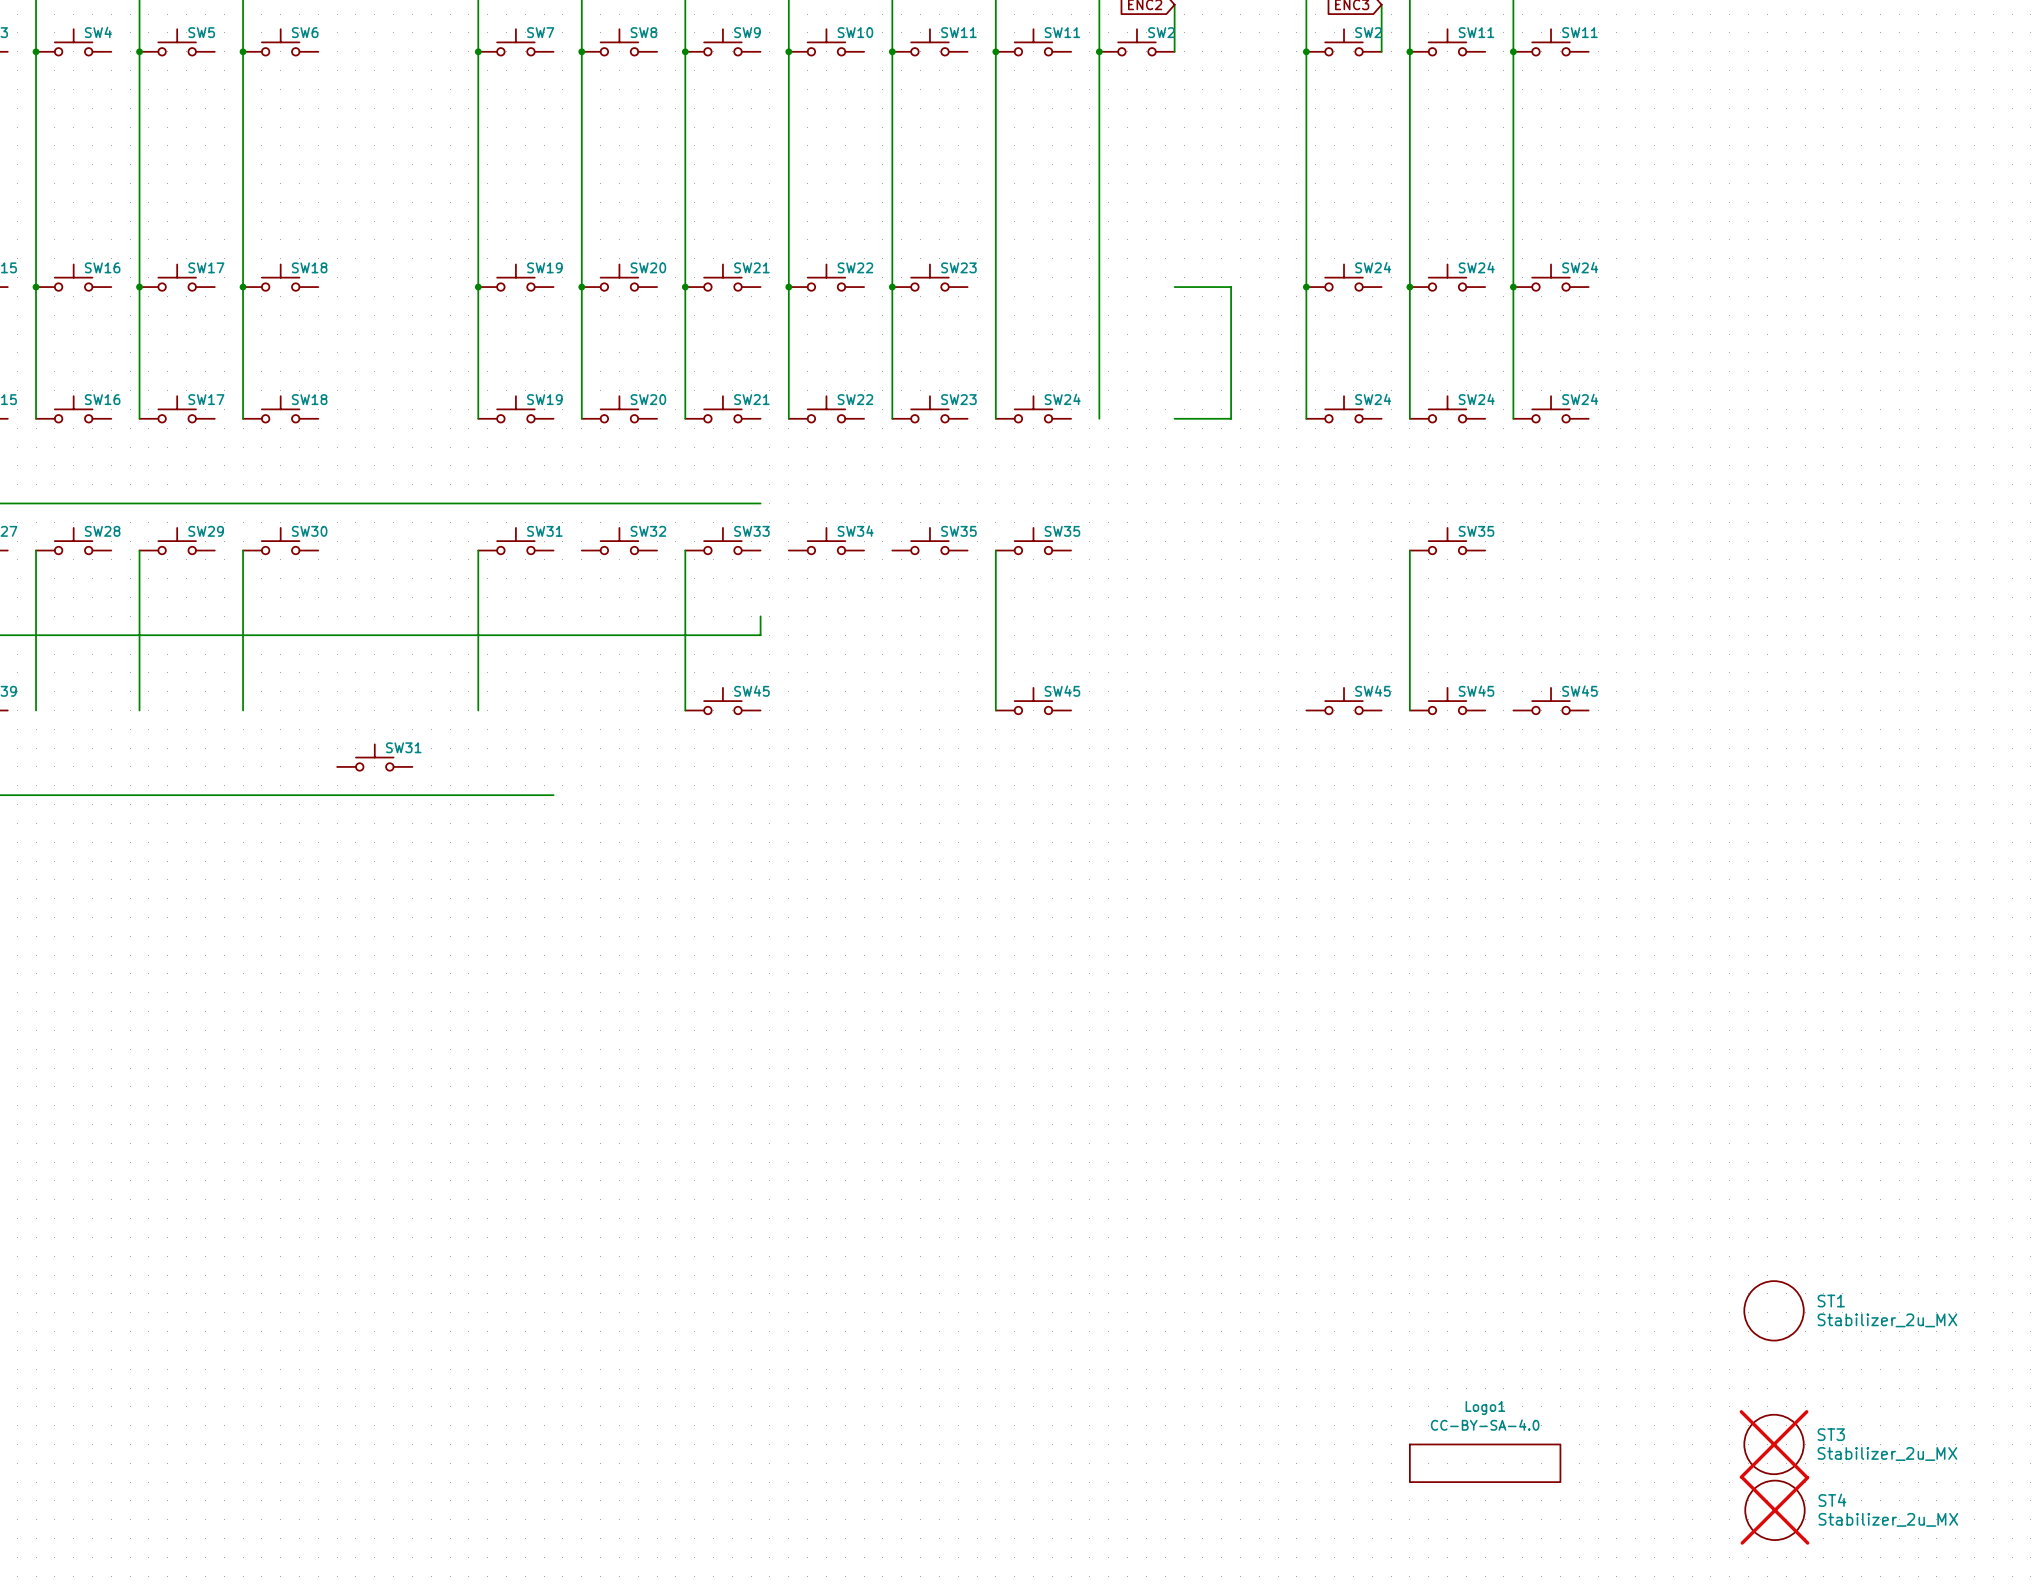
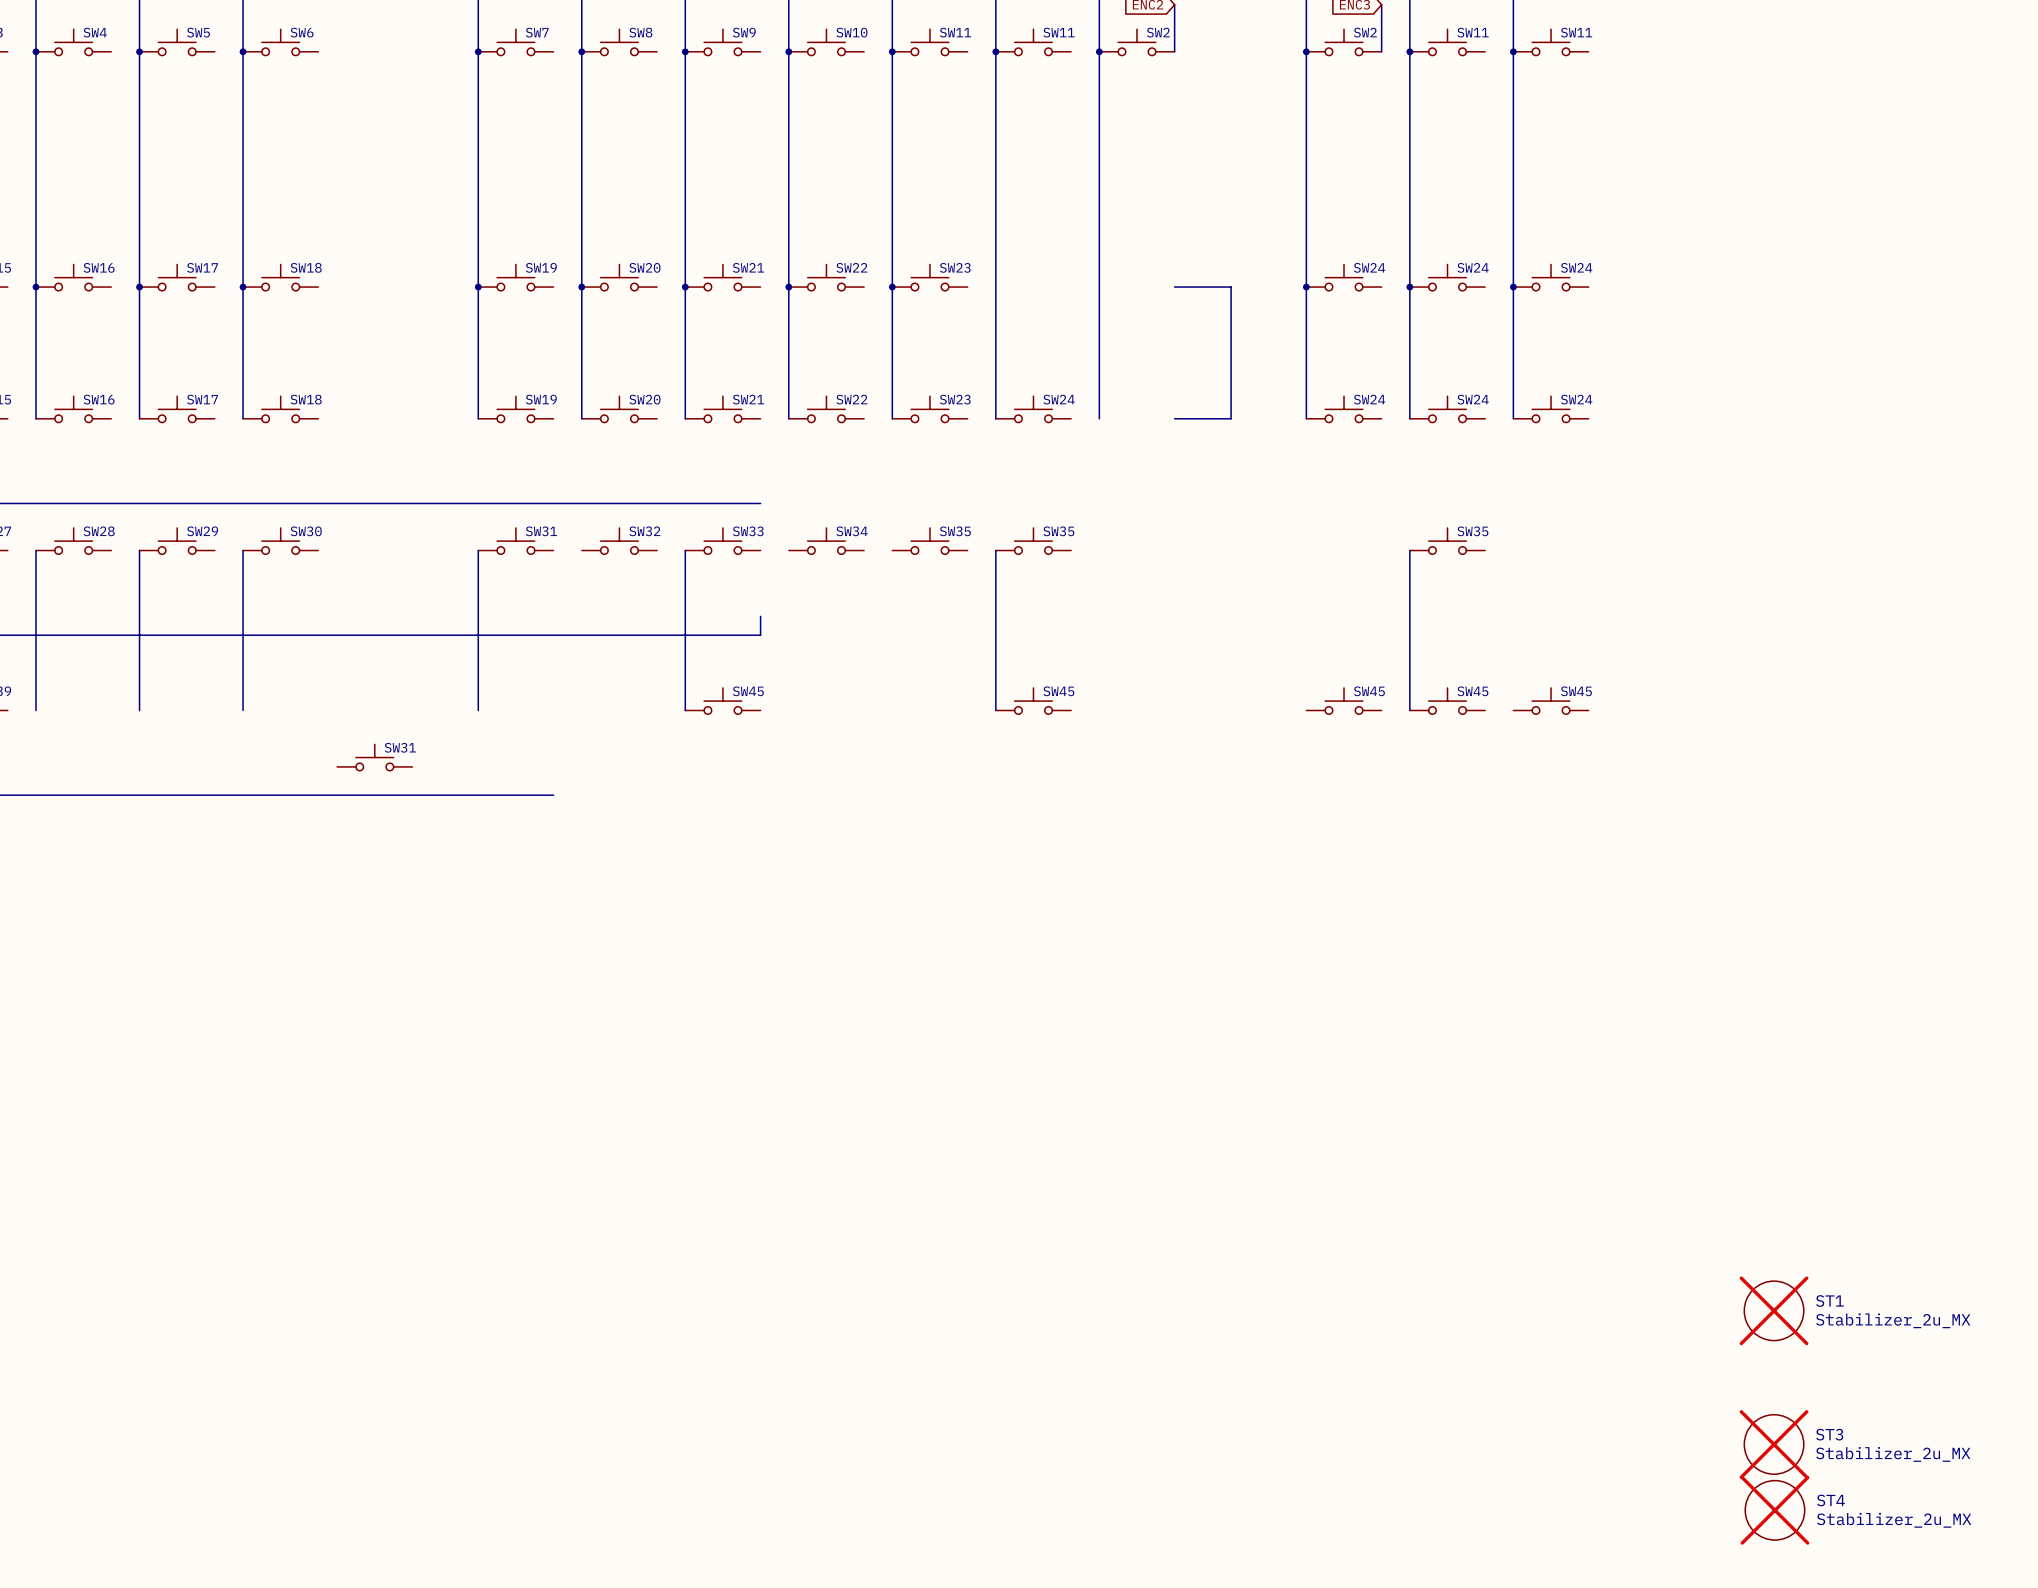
ST1 do-not-place cross: none -> (1774, 1310)
Logo1: CC-BY-SA-4.0 (1485, 1463) -> none

